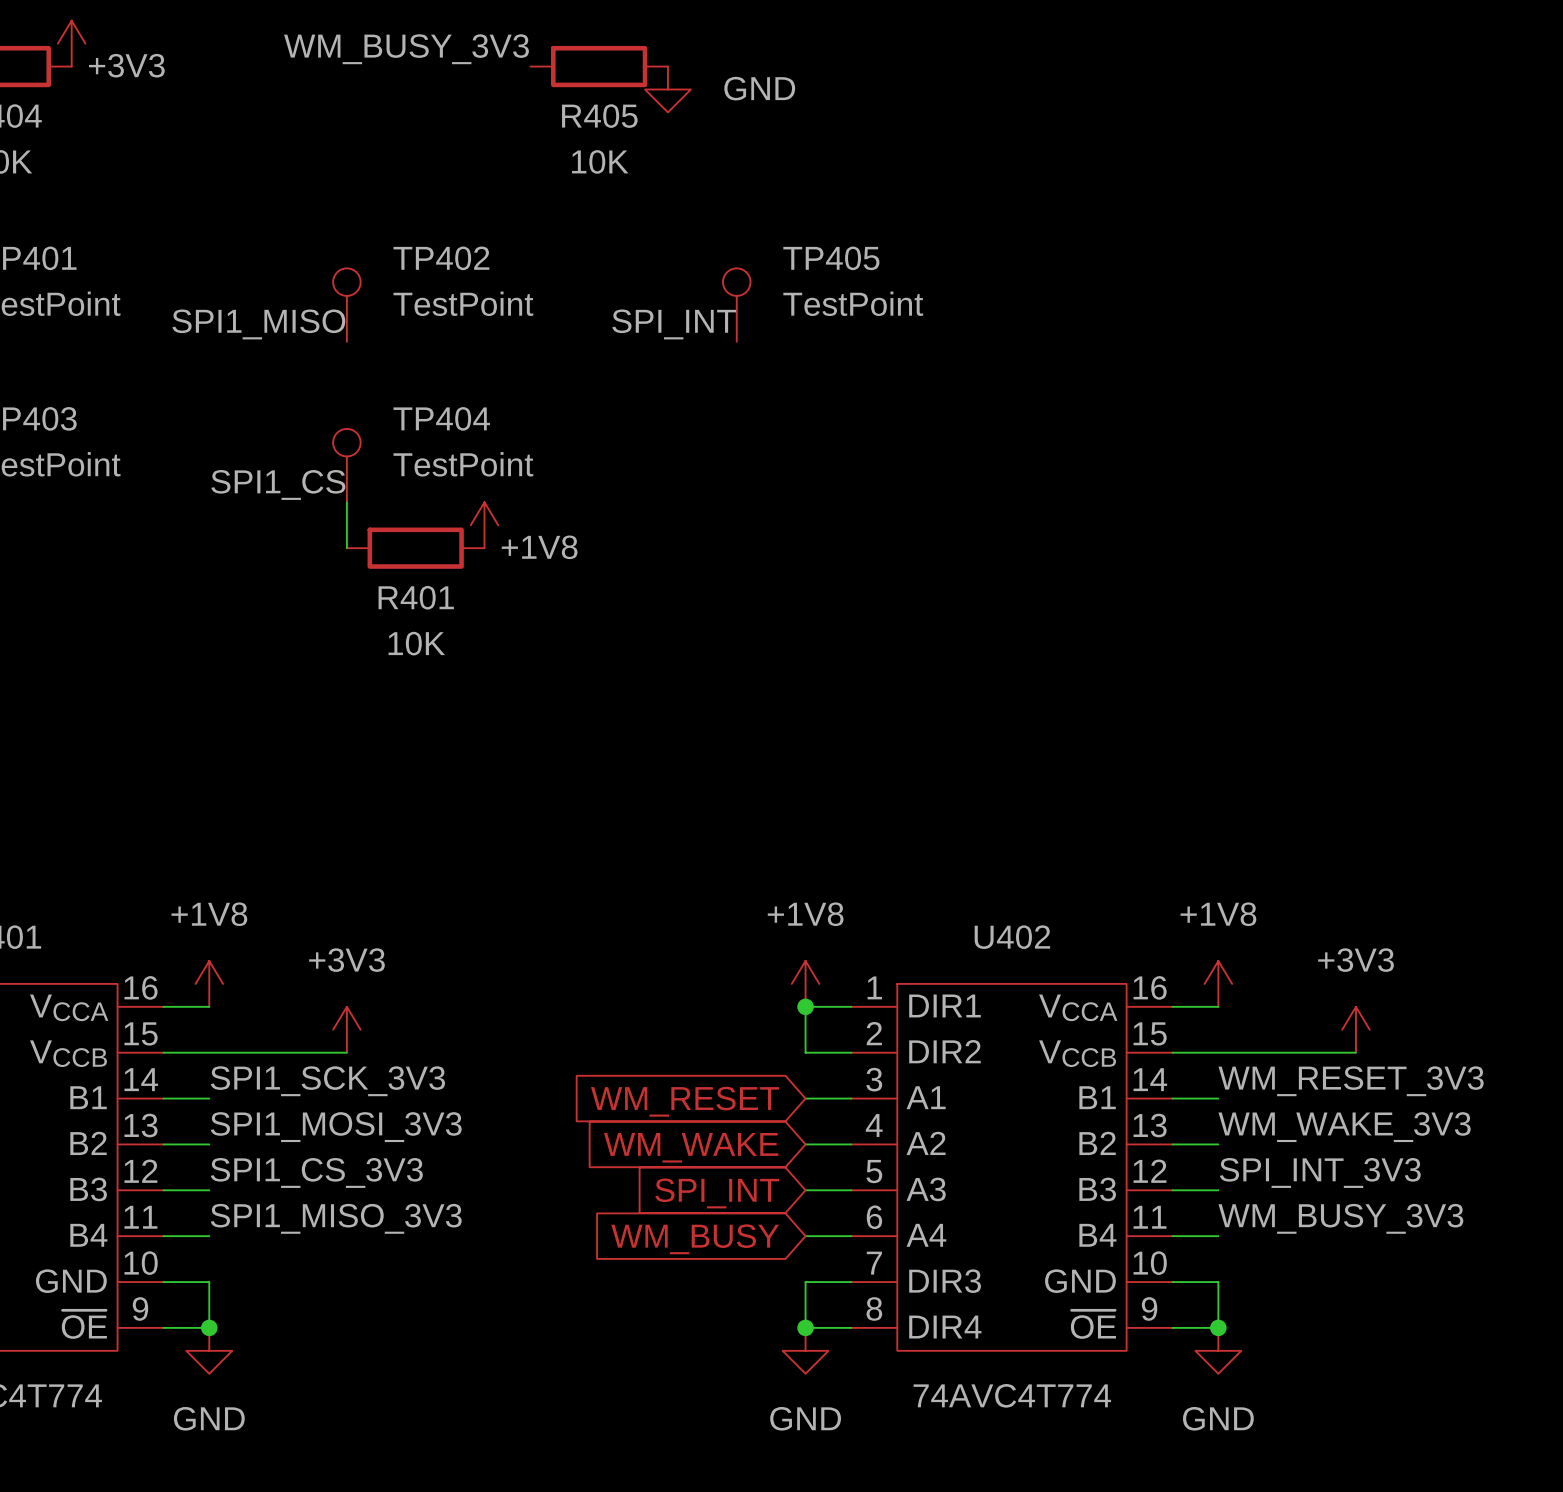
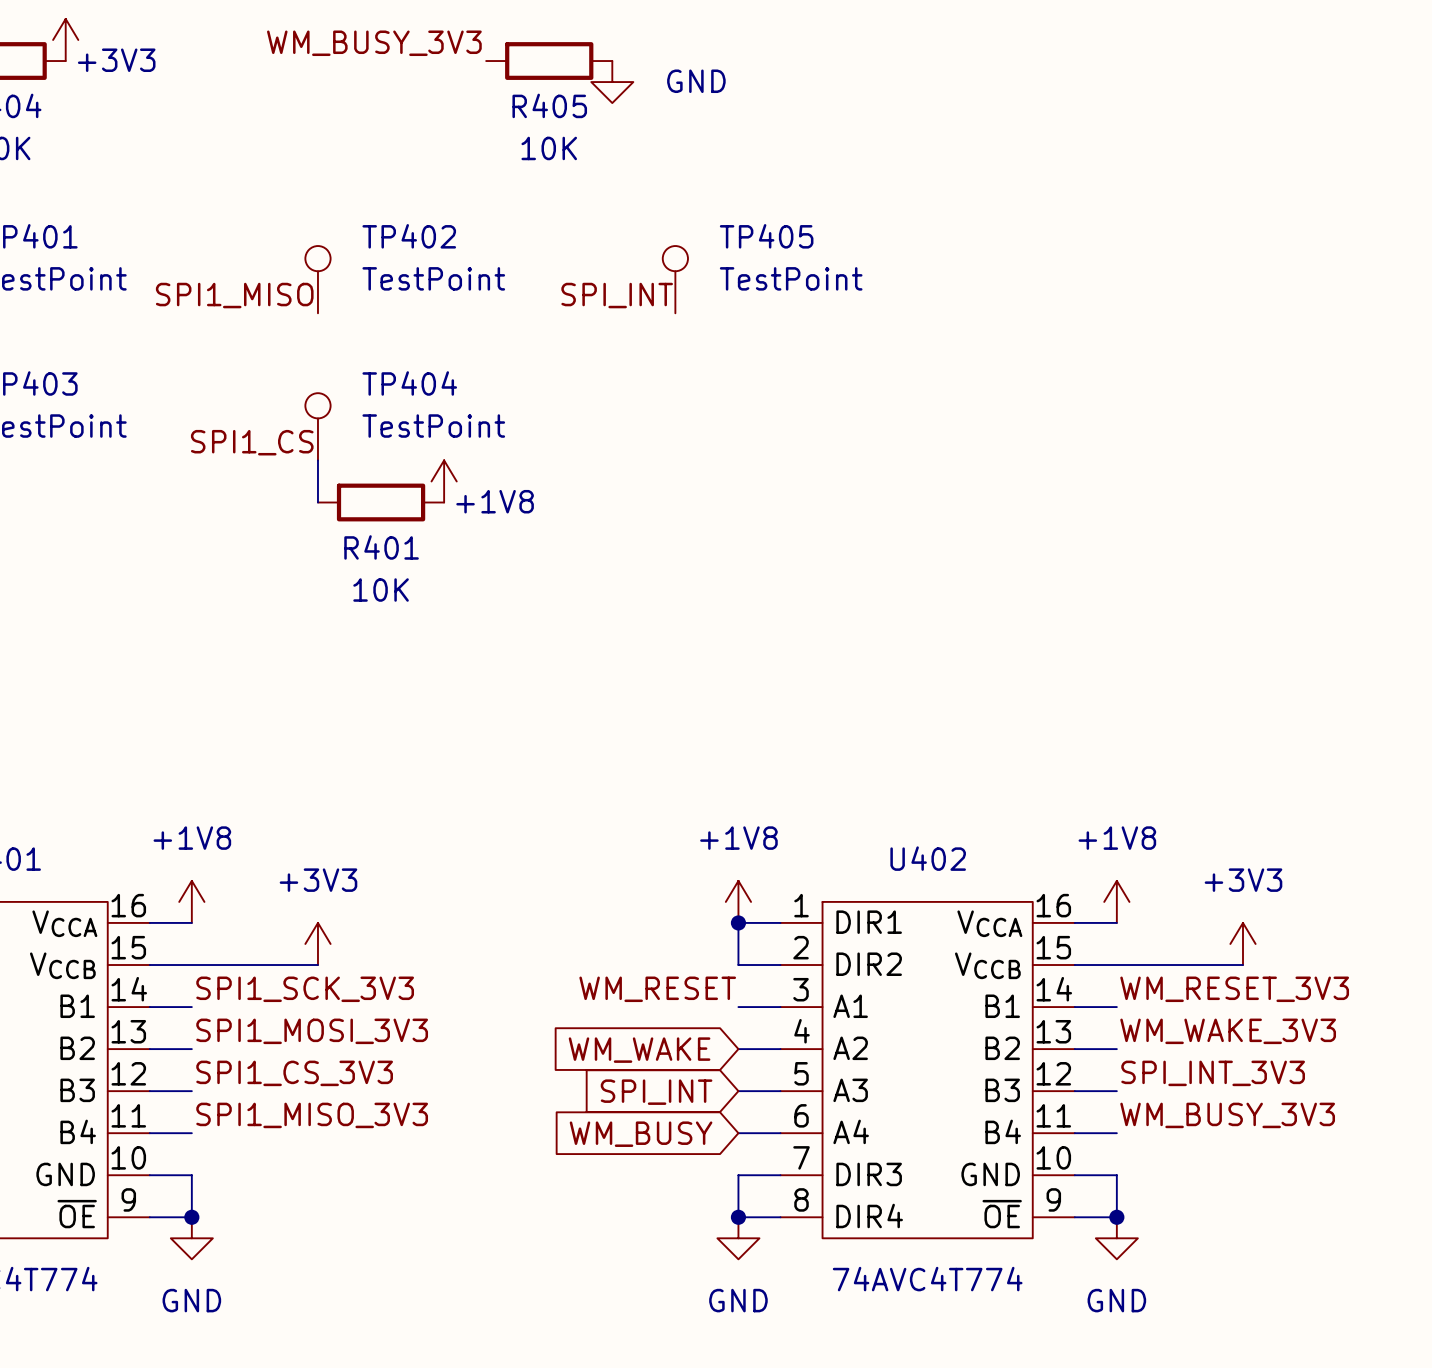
label: none -> WM_RESET (657, 989)
global label: WM_RESET (684, 1101) -> none

